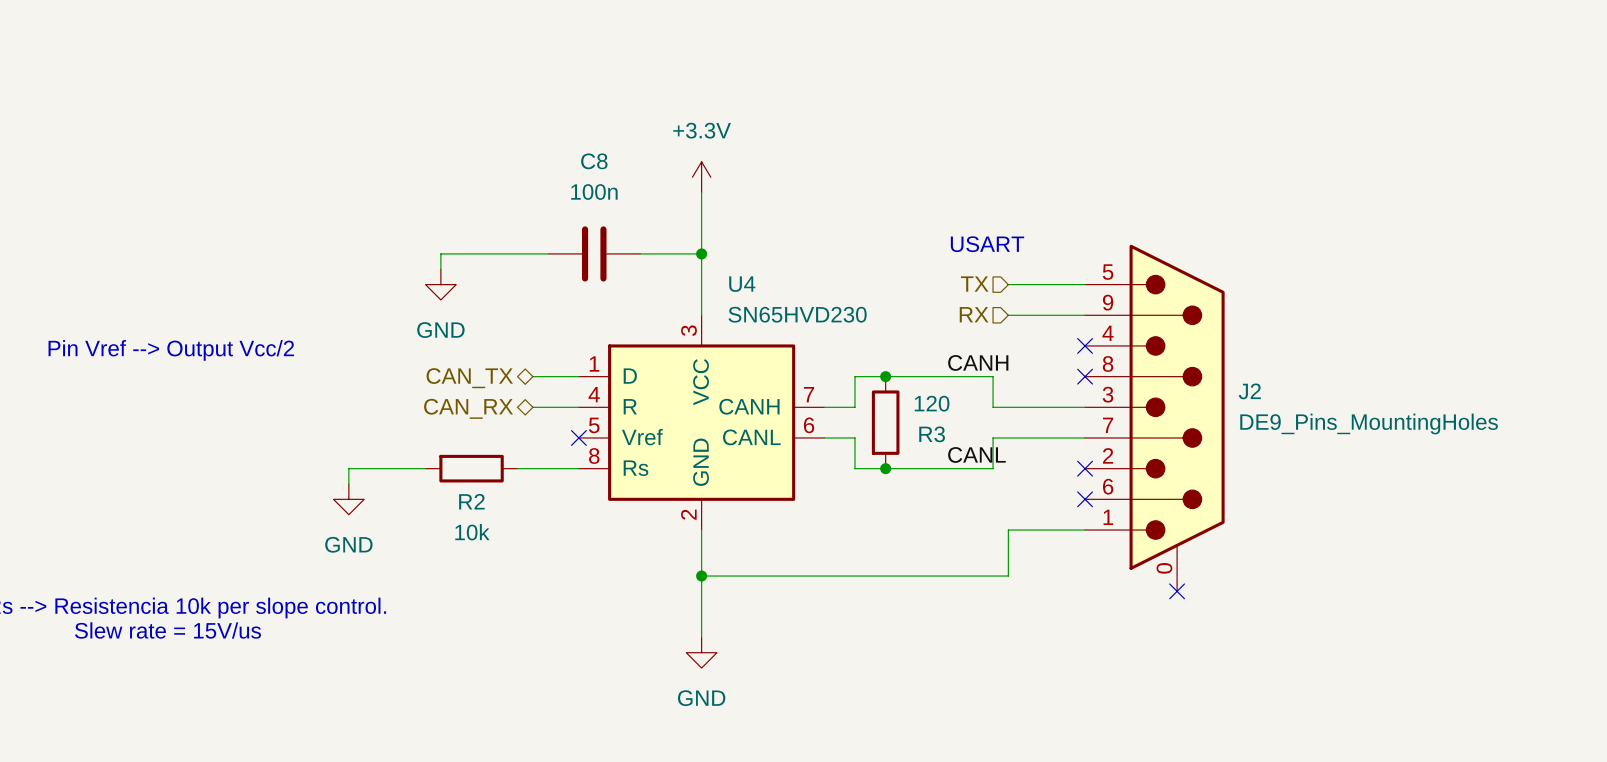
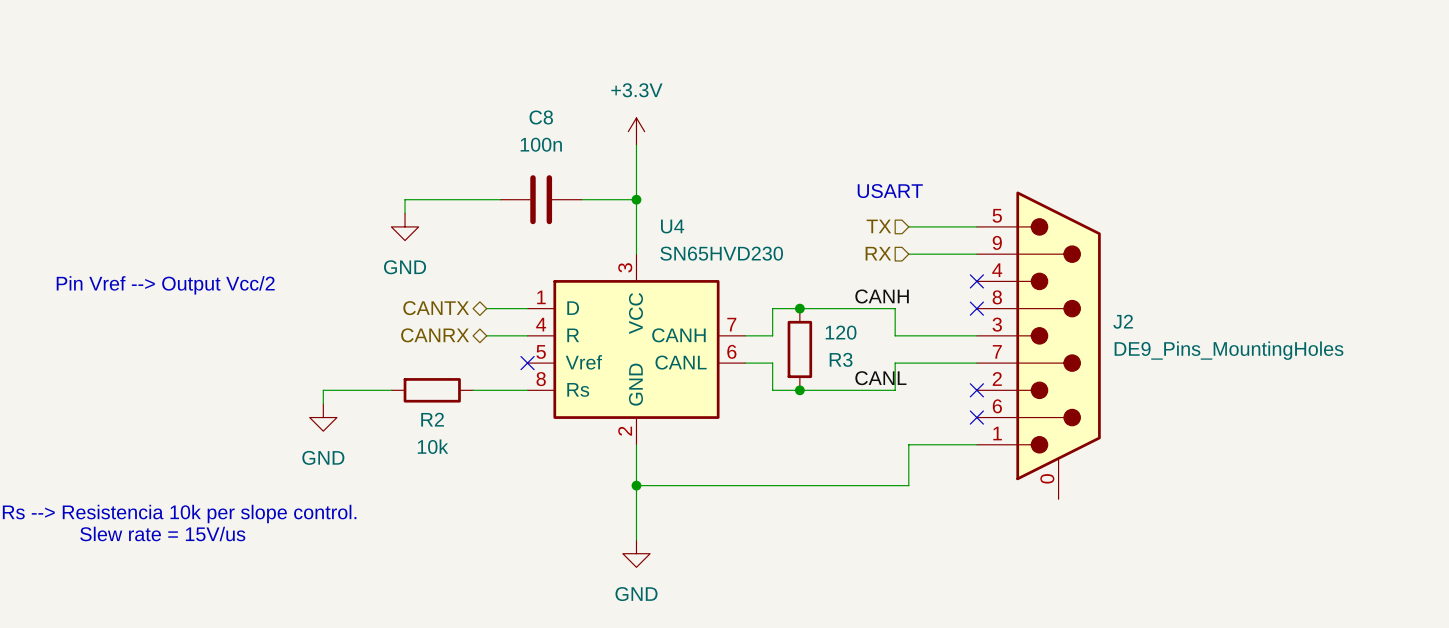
hierarchical label: CAN_TX (469, 378) -> CANTX (436, 308)
hierarchical label: CAN_RX (468, 408) -> CANRX (435, 335)
no-connect mark: (1177, 591) -> none

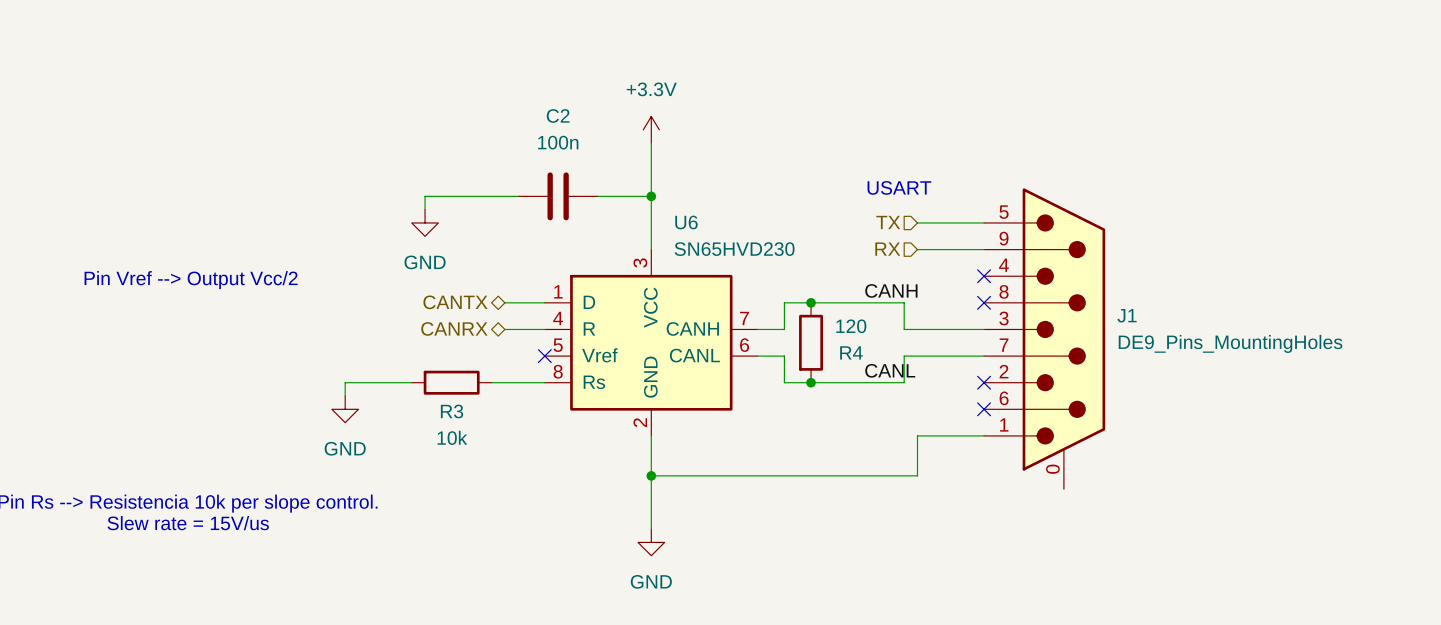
C8 name: C8 (541, 117) -> C2 (558, 116)
U4 name: U4 (672, 226) -> U6 (686, 222)
J2 name: J2 (1123, 321) -> J1 (1127, 315)
R3 name: R3 (841, 359) -> R4 (851, 352)
R2 name: R2 (432, 419) -> R3 (452, 411)

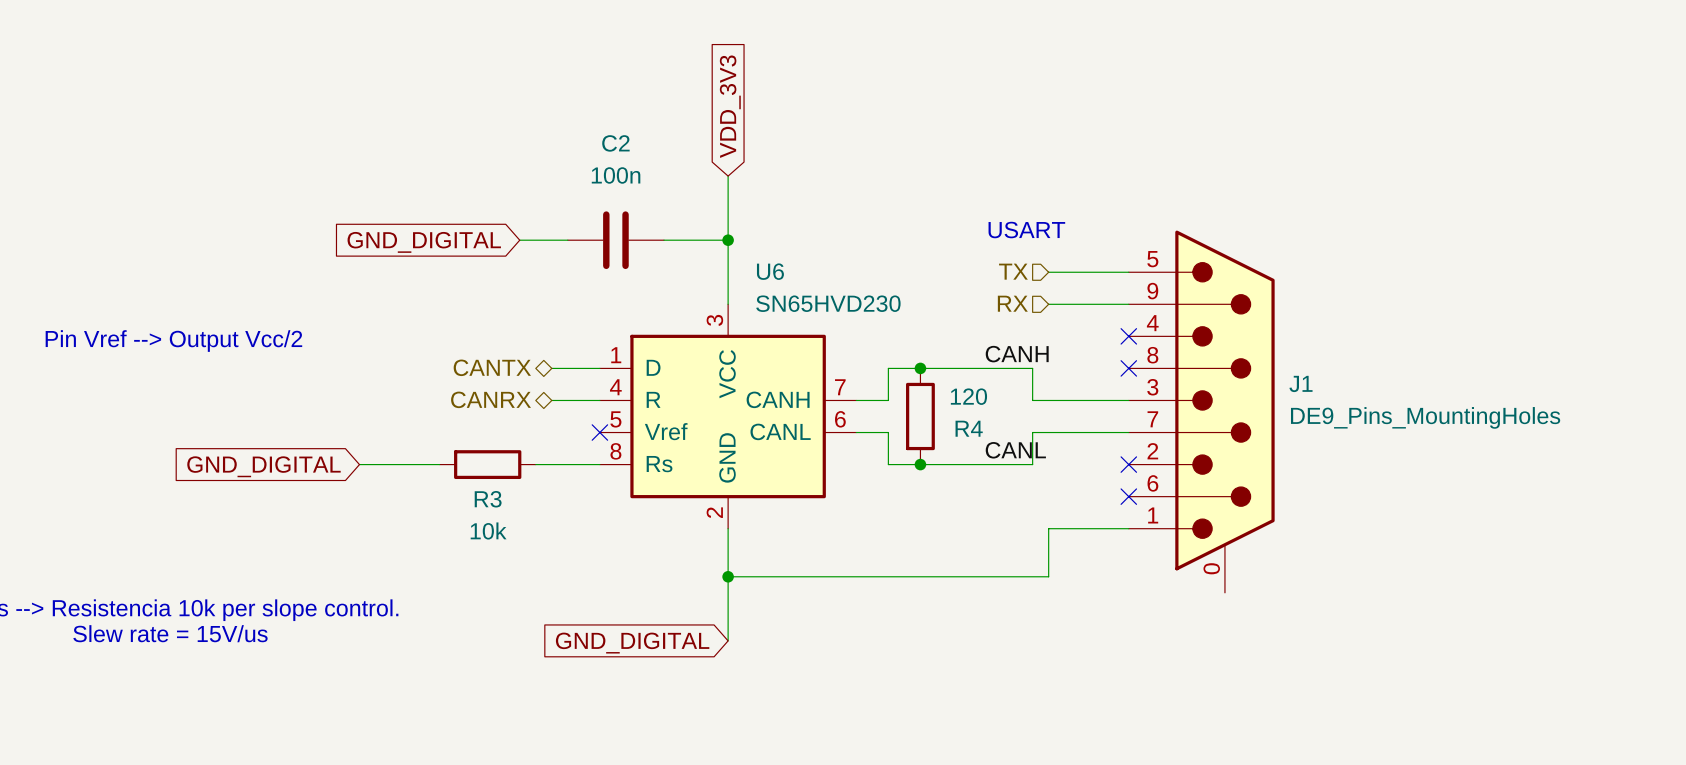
global label: none -> VDD_3V3 (730, 106)
power symbol: +3.3V (651, 129) -> none
wire: (478, 196) (425, 196) (425, 209) -> none
global label: none -> GND_DIGITAL (424, 242)
power symbol: GND (425, 222) -> none
wire: (345, 382) (345, 396) -> none
global label: none -> GND_DIGITAL (263, 466)
power symbol: GND (345, 409) -> none
global label: none -> GND_DIGITAL (632, 643)
power symbol: GND (651, 542) -> none

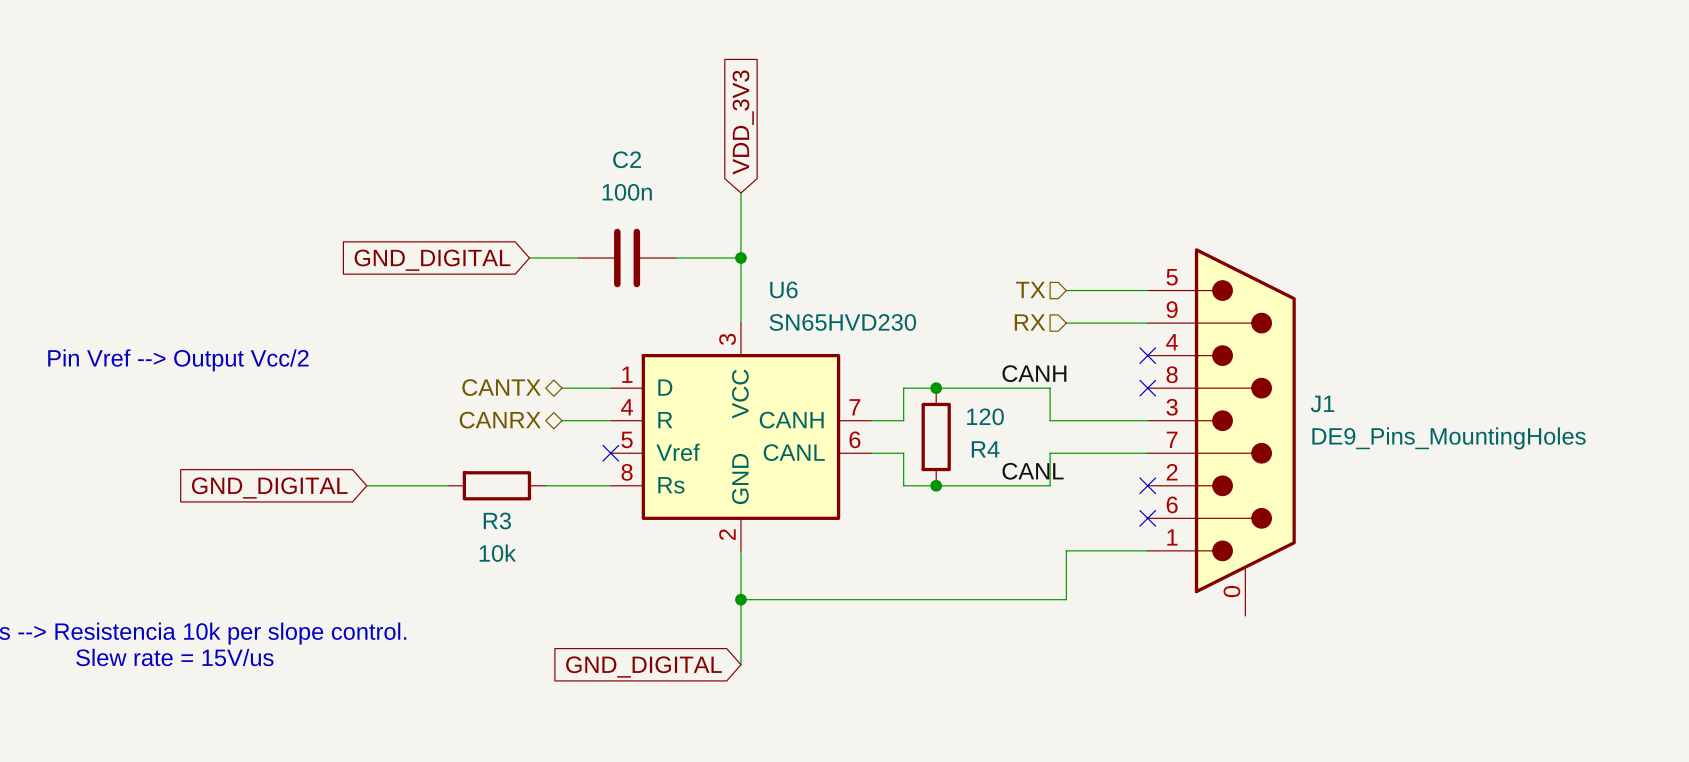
text: USART (1026, 230) -> none

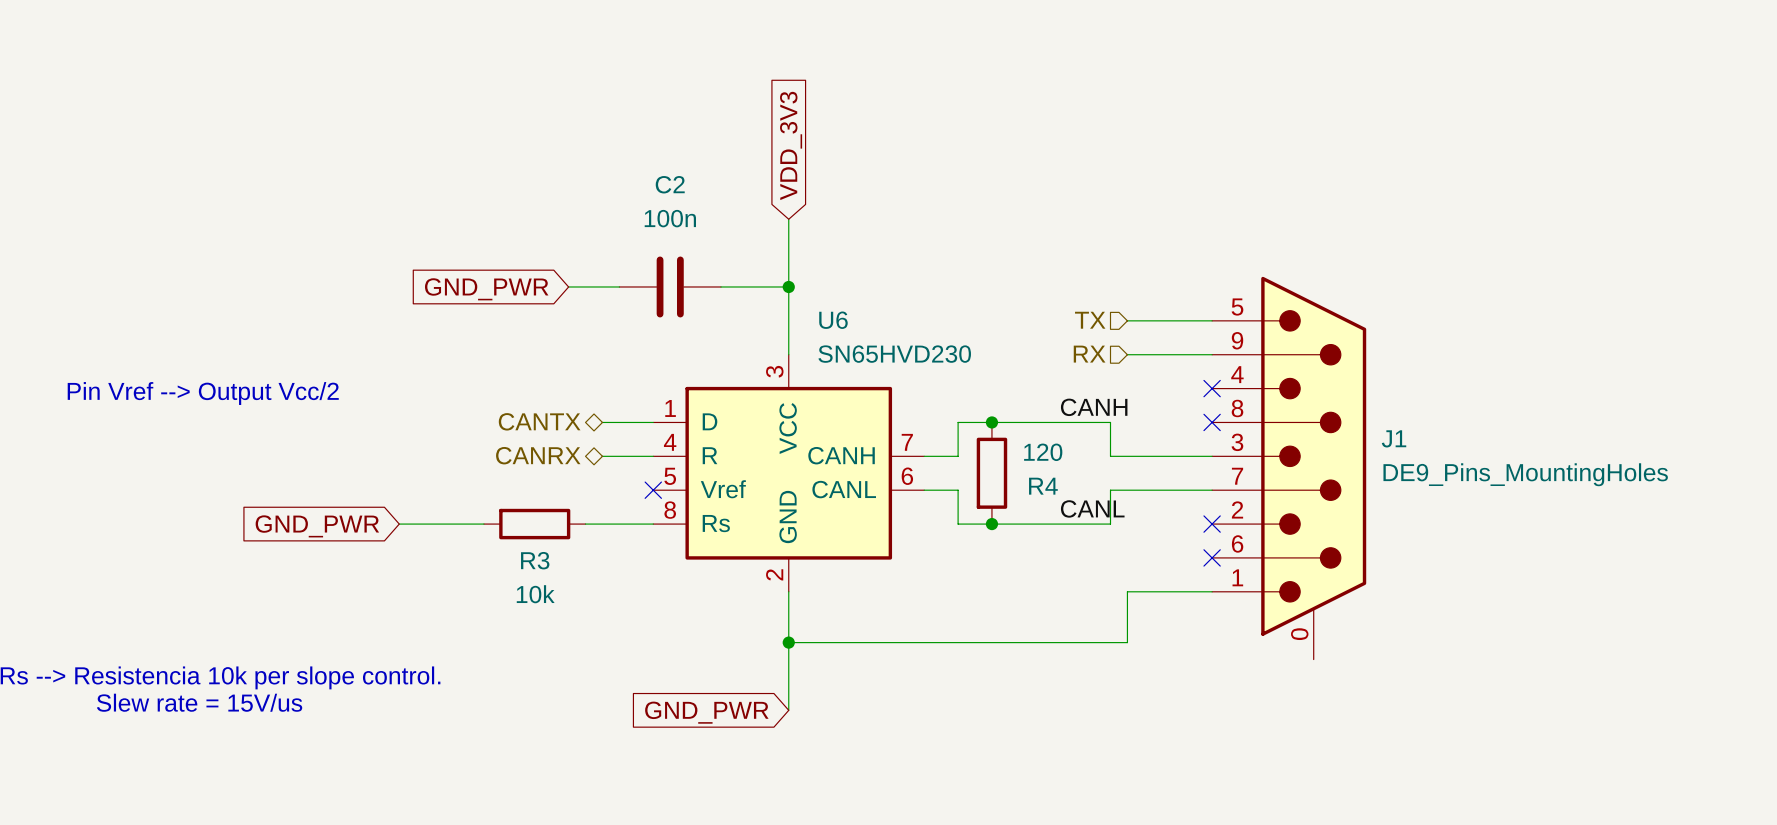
global label: GND_DIGITAL (432, 260) -> GND_PWR (486, 289)
global label: GND_DIGITAL (269, 488) -> GND_PWR (317, 526)
global label: GND_DIGITAL (644, 666) -> GND_PWR (706, 712)

